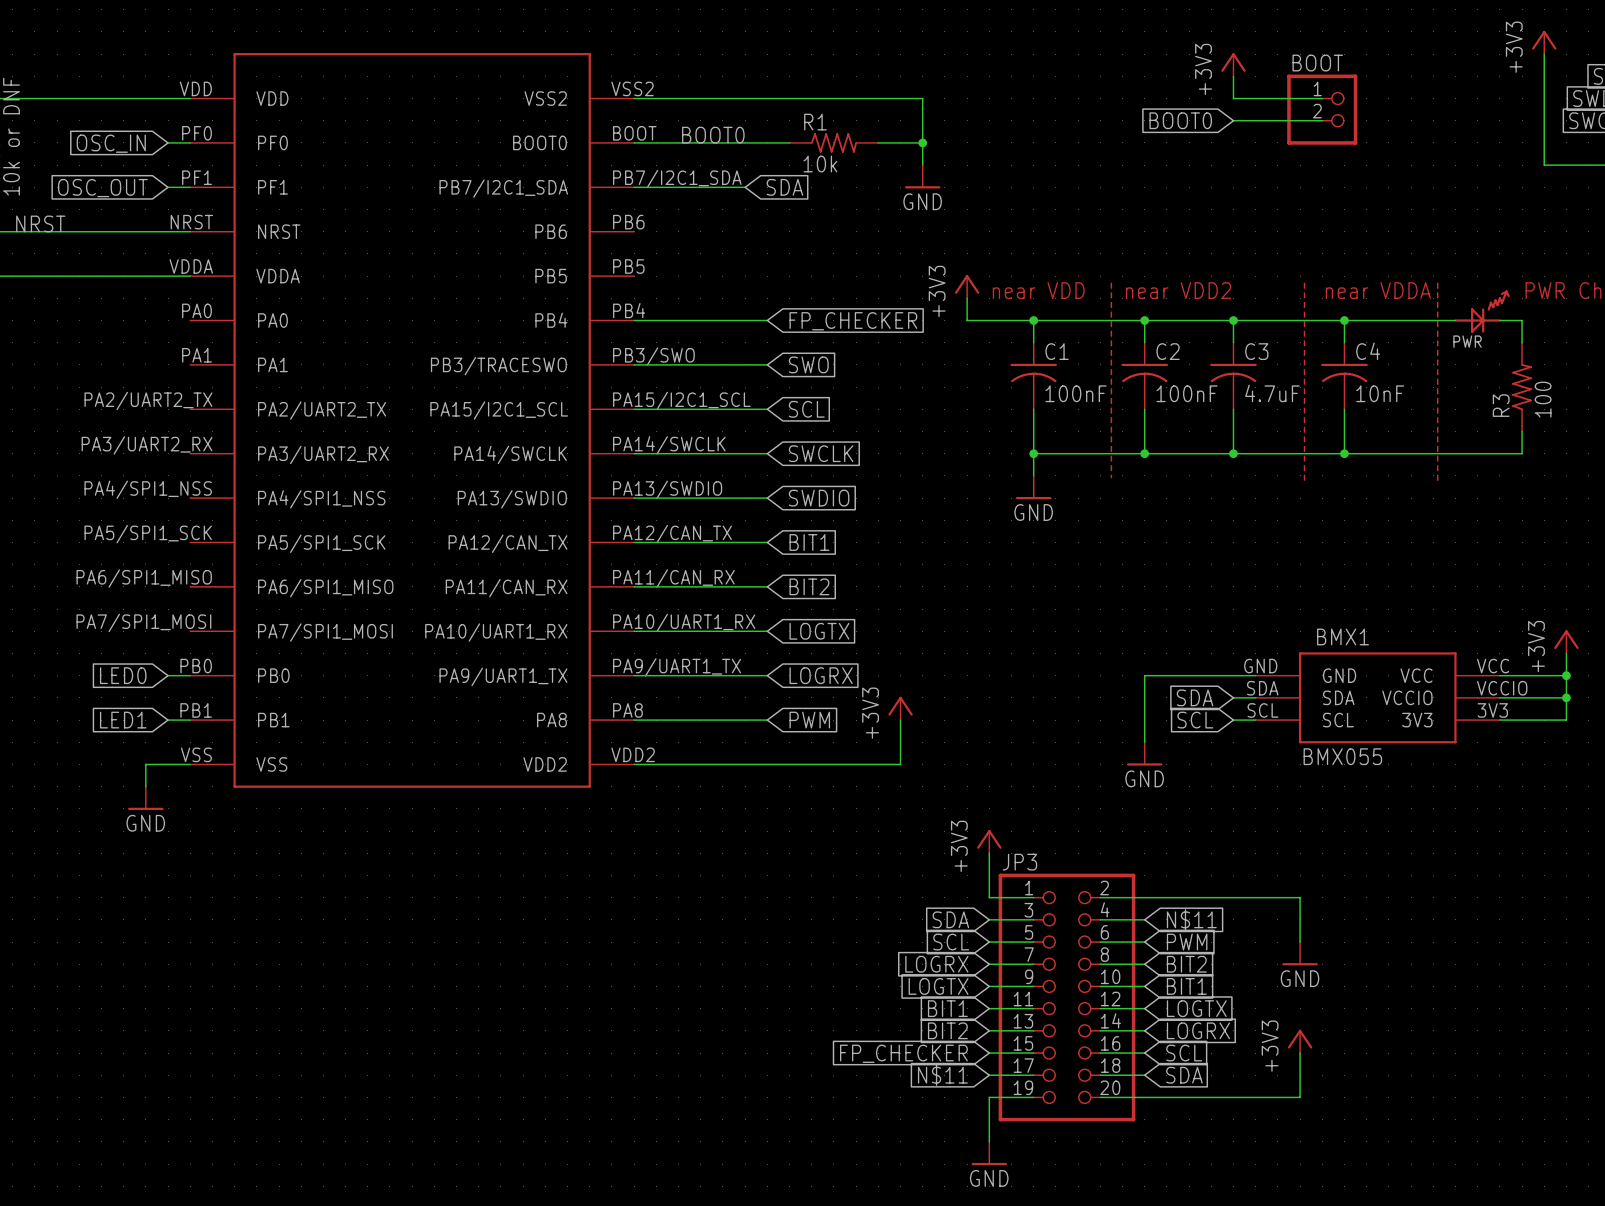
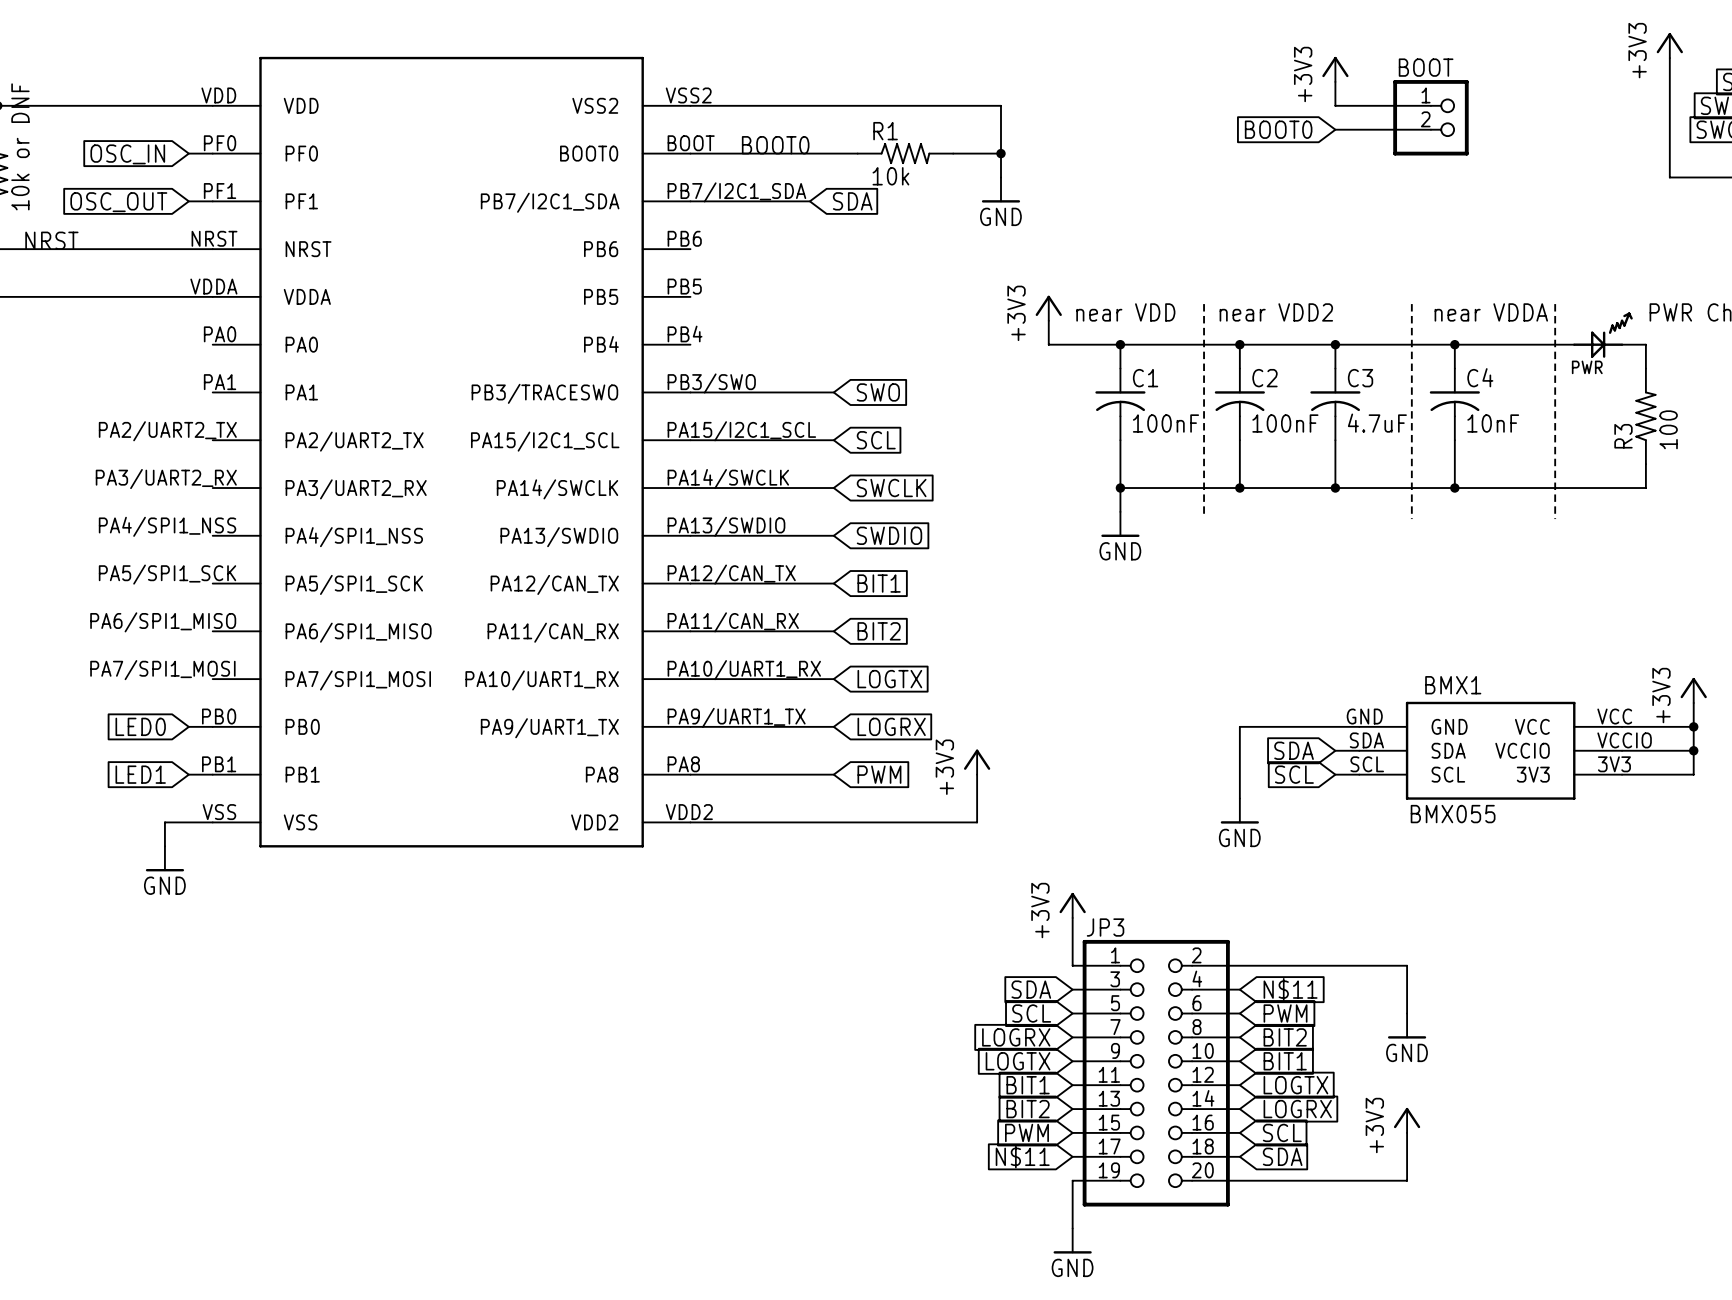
wire: (634, 320) (767, 320) -> none
global label: FP_CHECKER (853, 321) -> none
global label: FP_CHECKER (903, 1053) -> PWM (1026, 1132)

